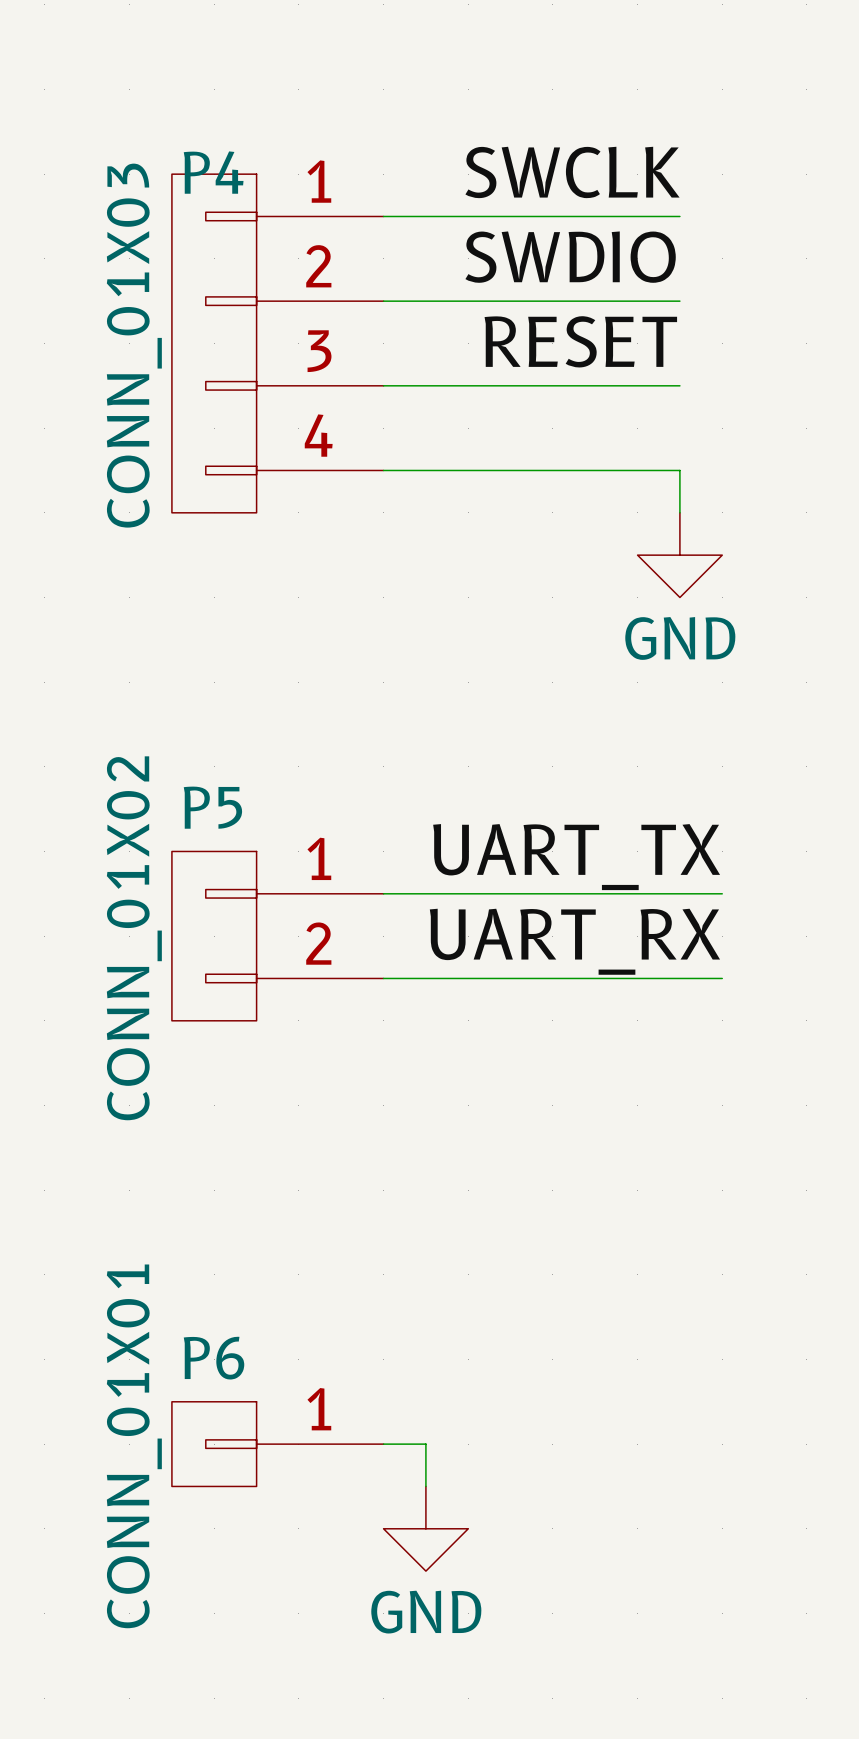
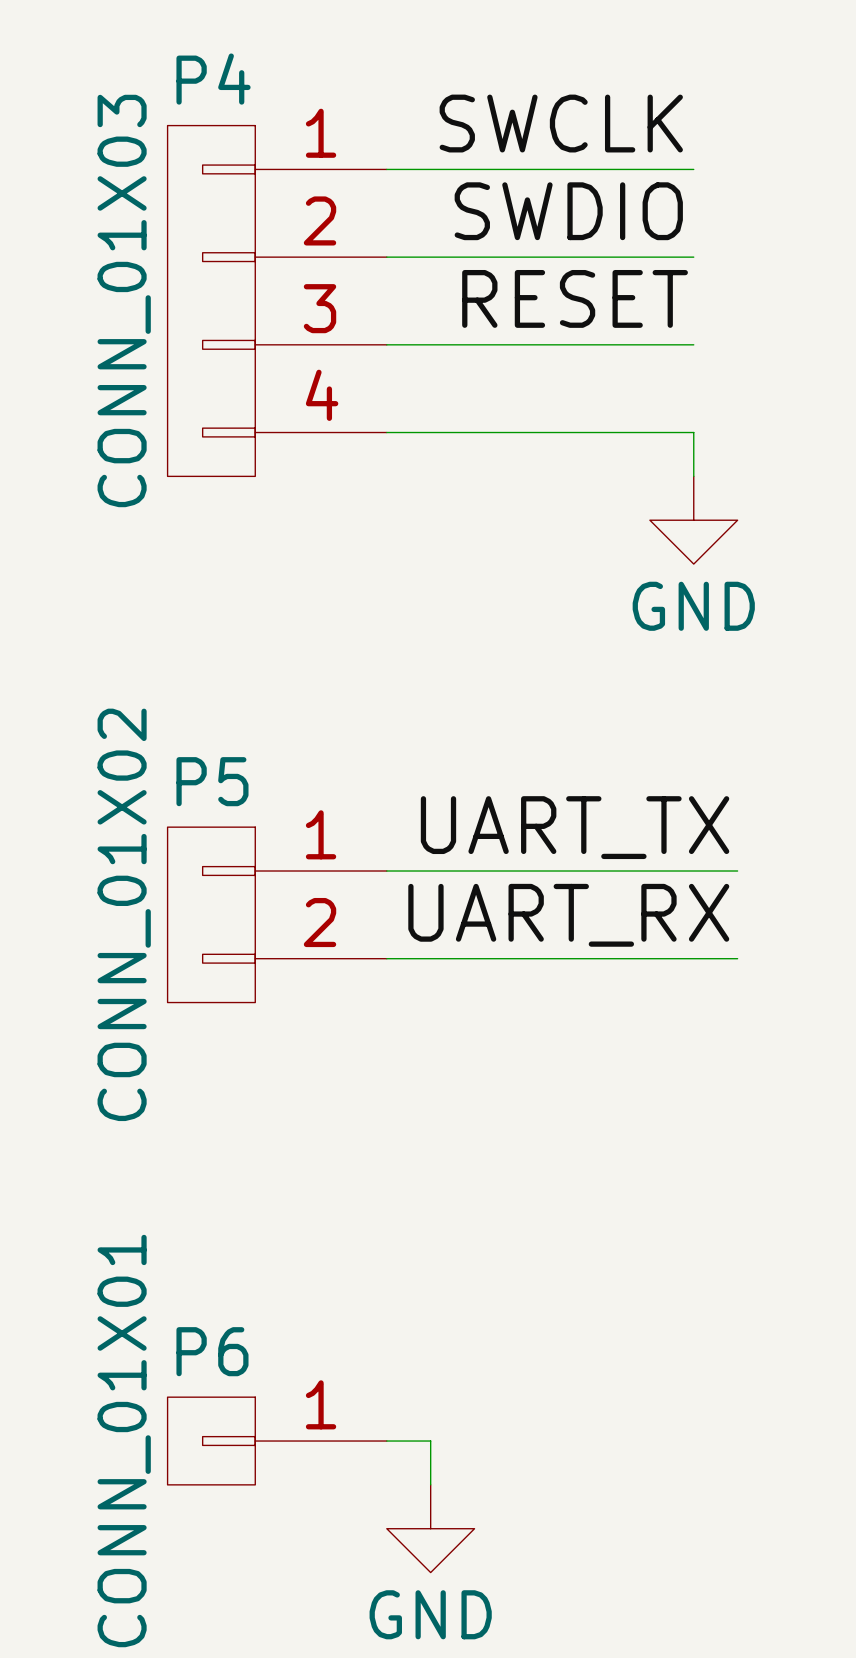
P4 name position: P4 (213, 172) -> P4 (213, 79)

